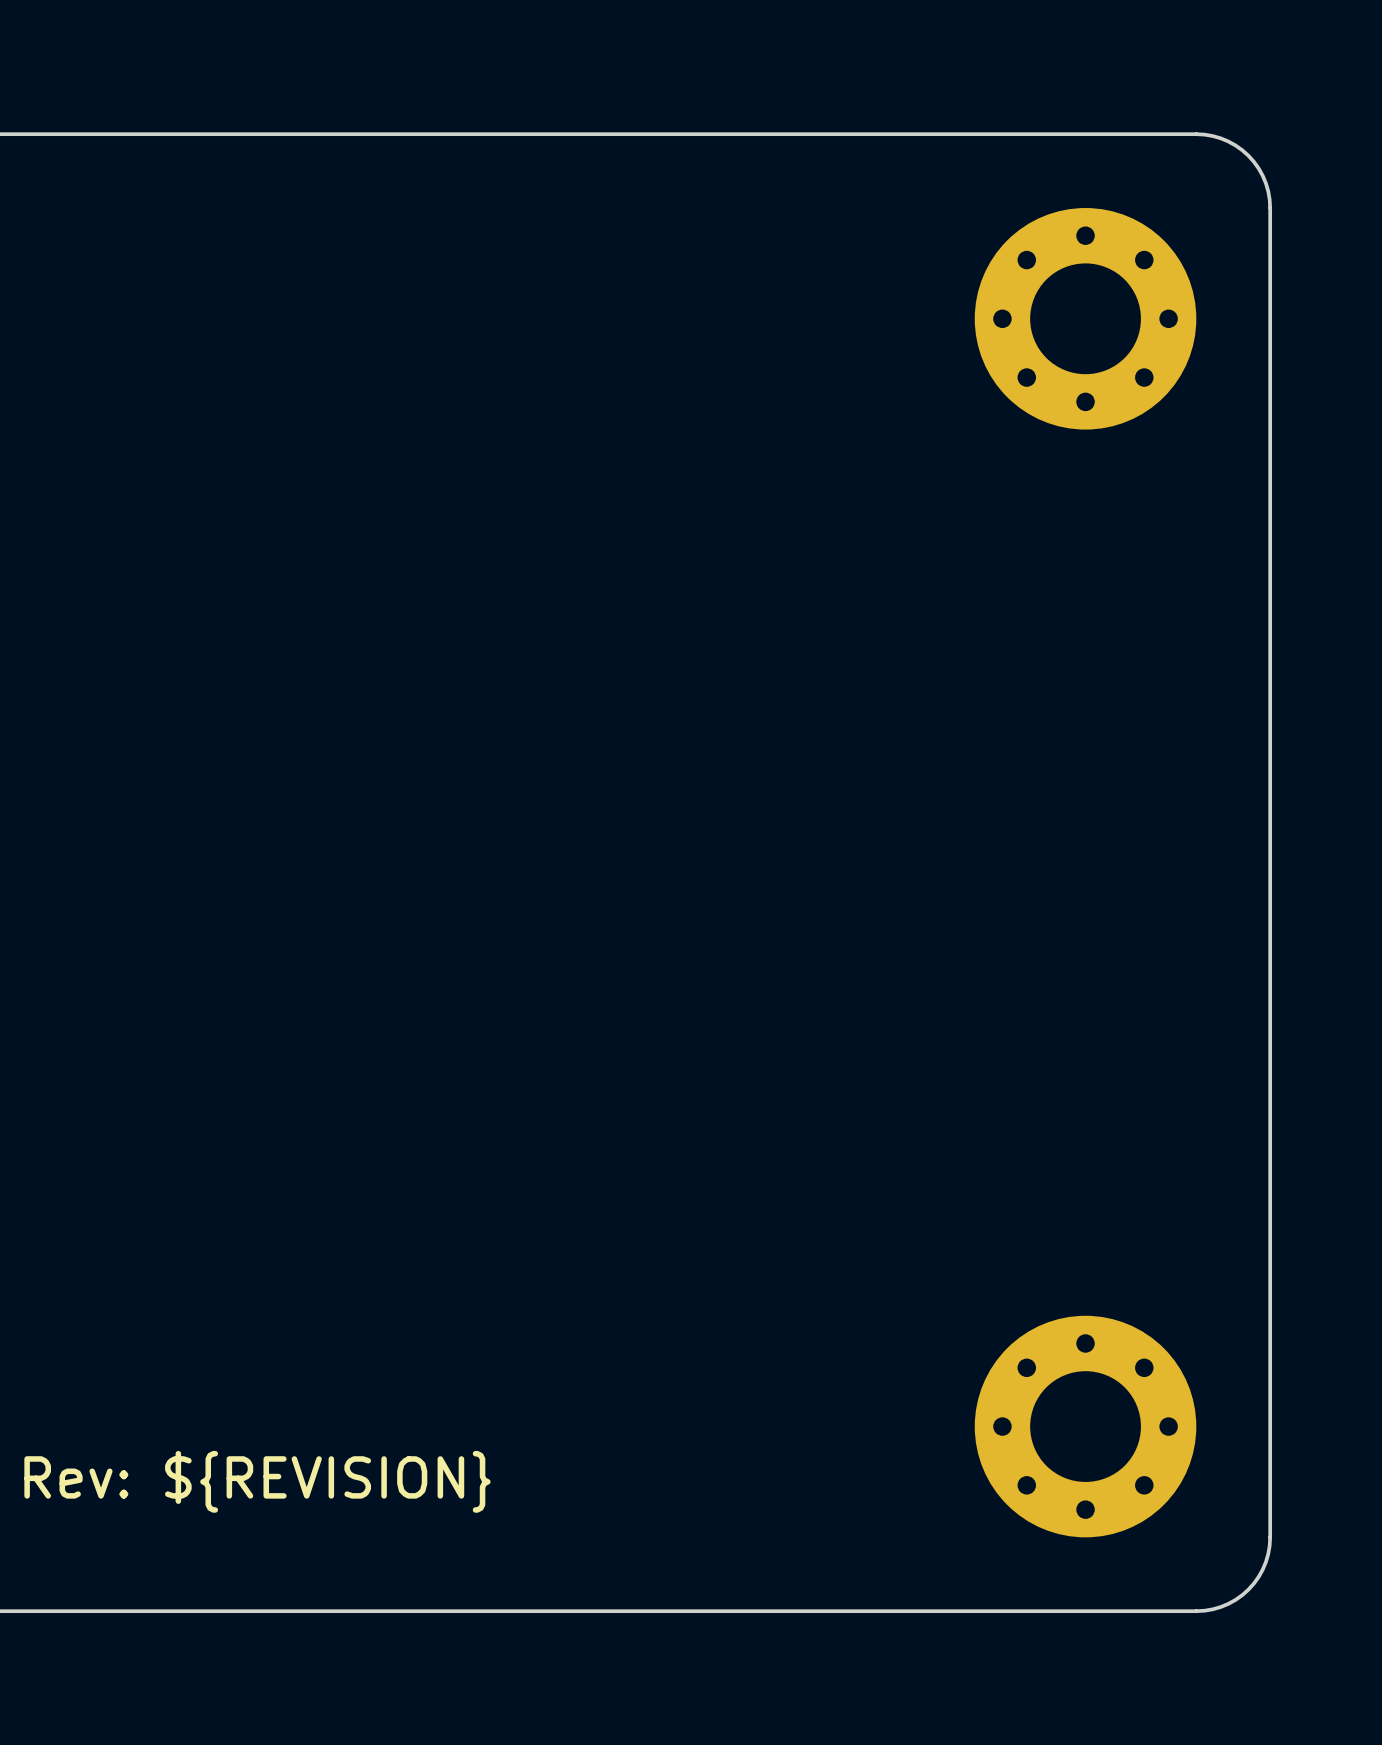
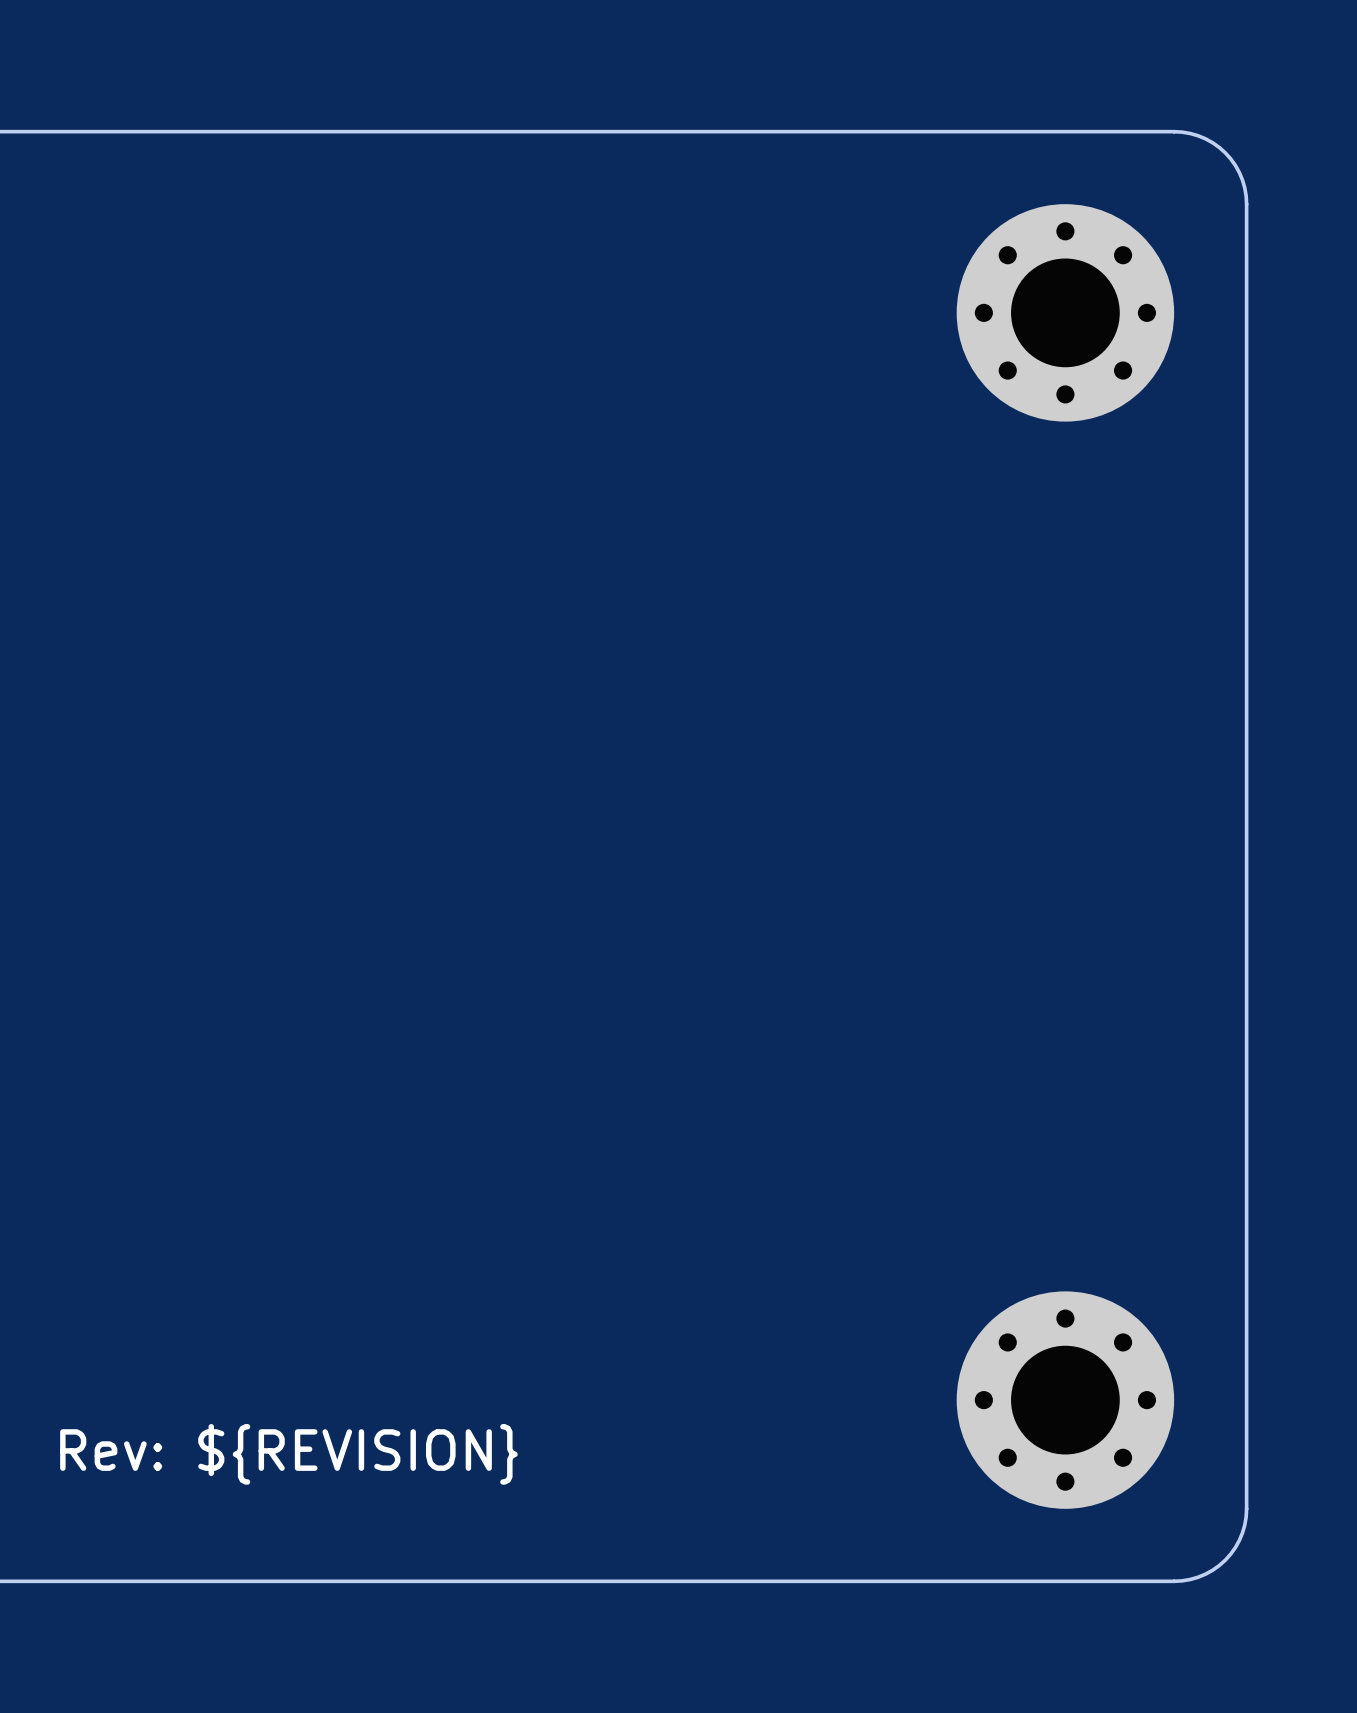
text position: Rev: ${REVISION} (257, 1481) -> Rev: ${REVISION} (288, 1454)

